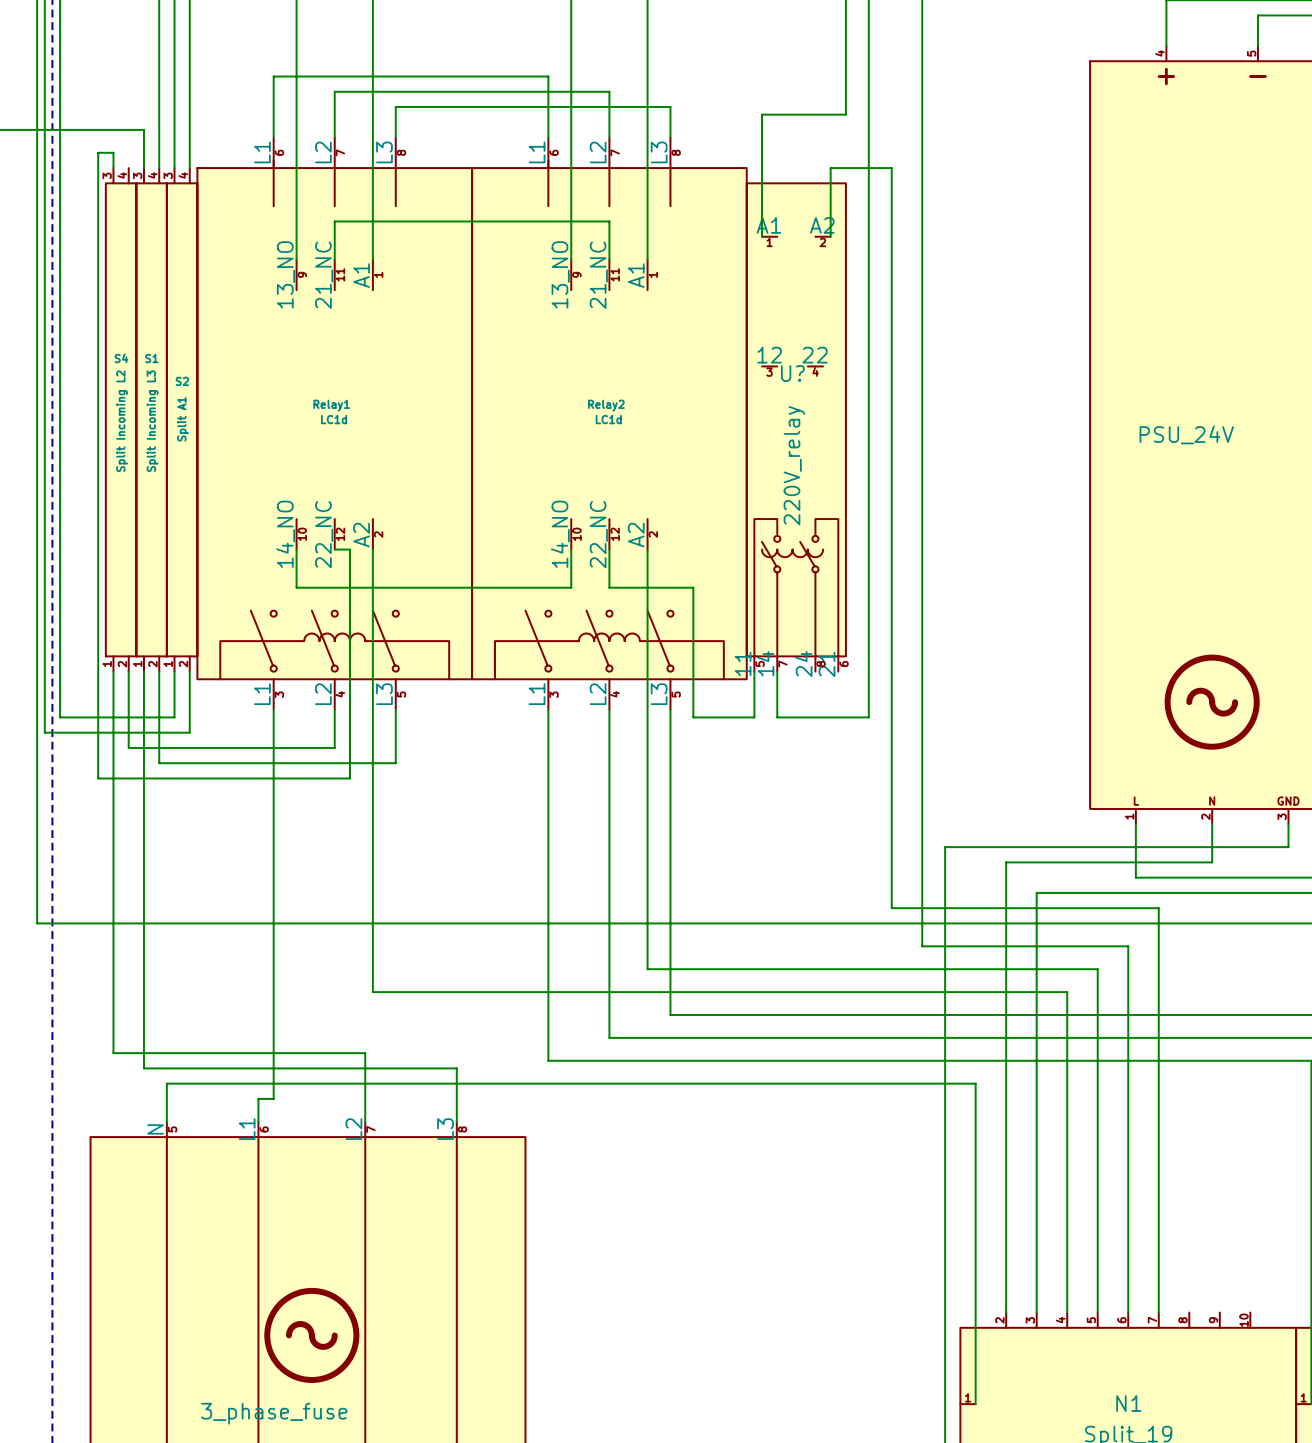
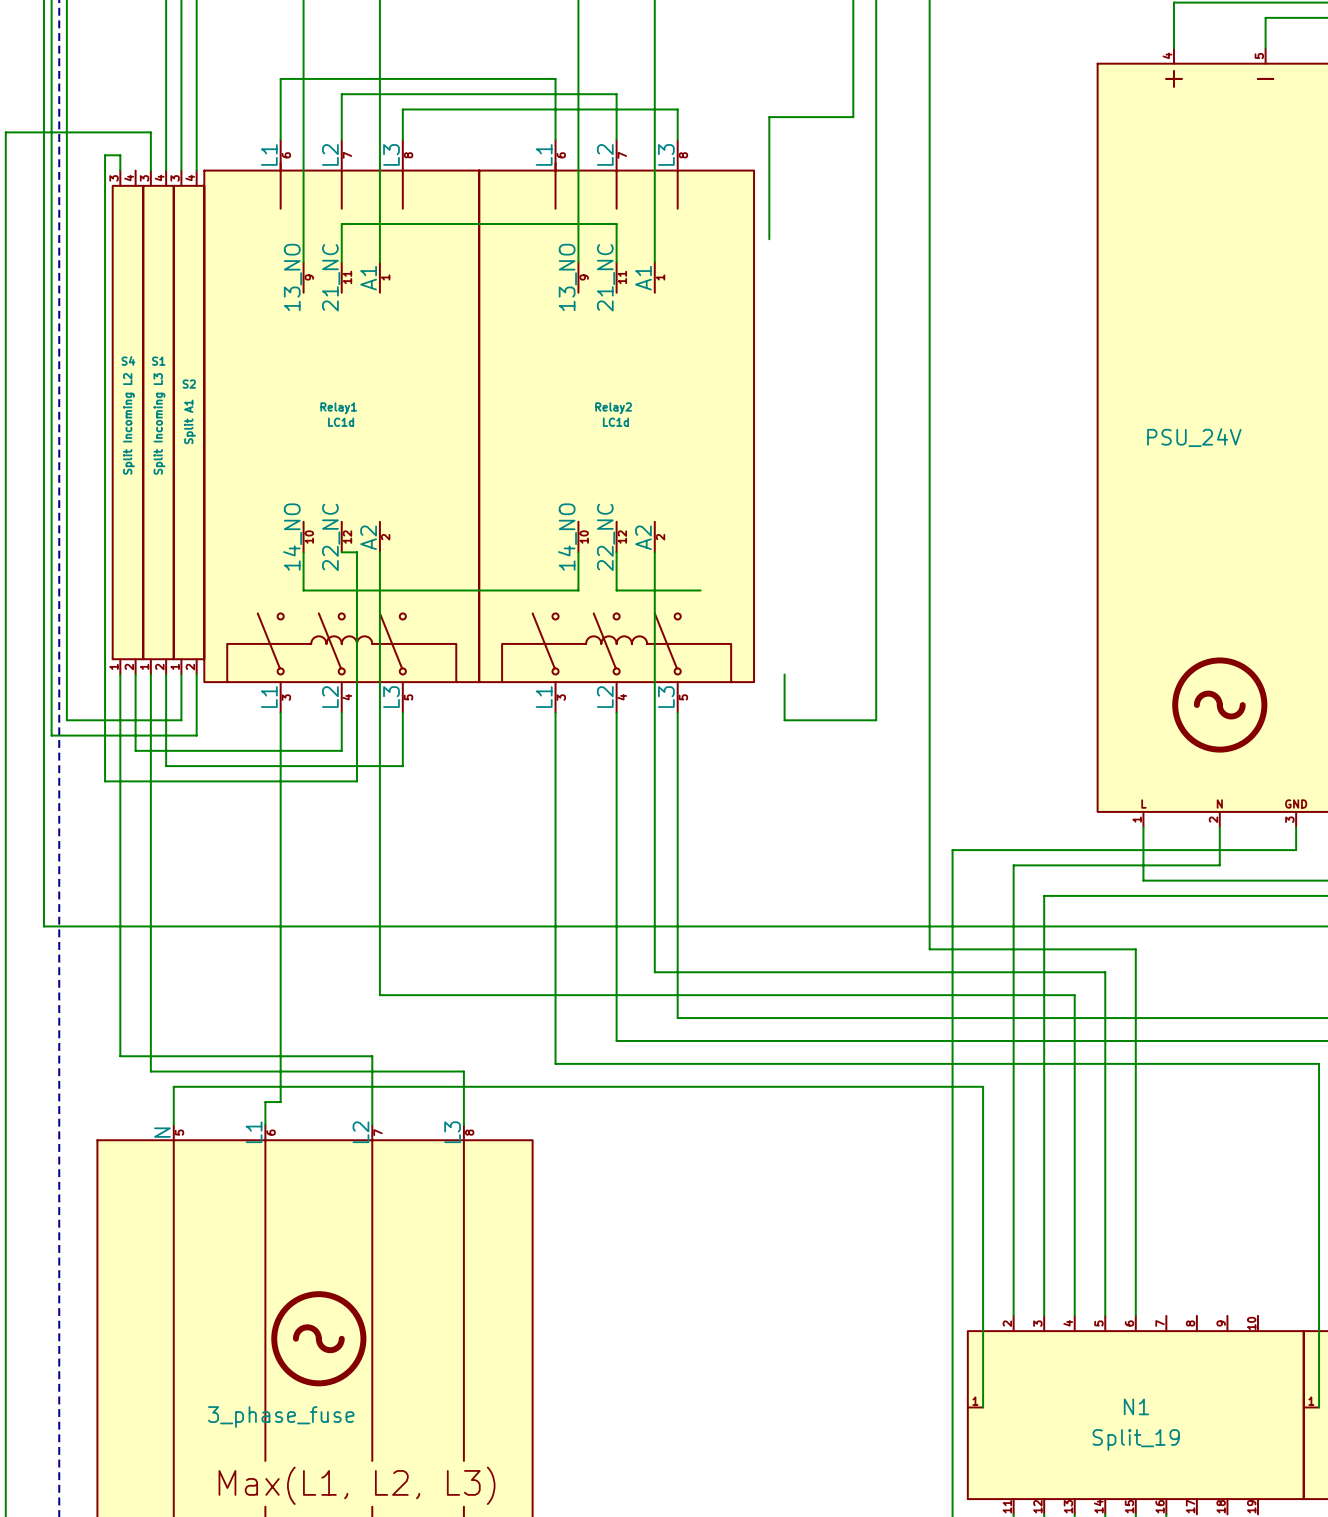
wire: (830, 236) (830, 168) (891, 168) (891, 908) (1158, 908) (1158, 1312) -> none
U?: 220V_relay (796, 427) -> none
wire: (693, 587) (693, 717) (754, 717) (754, 671) -> none

